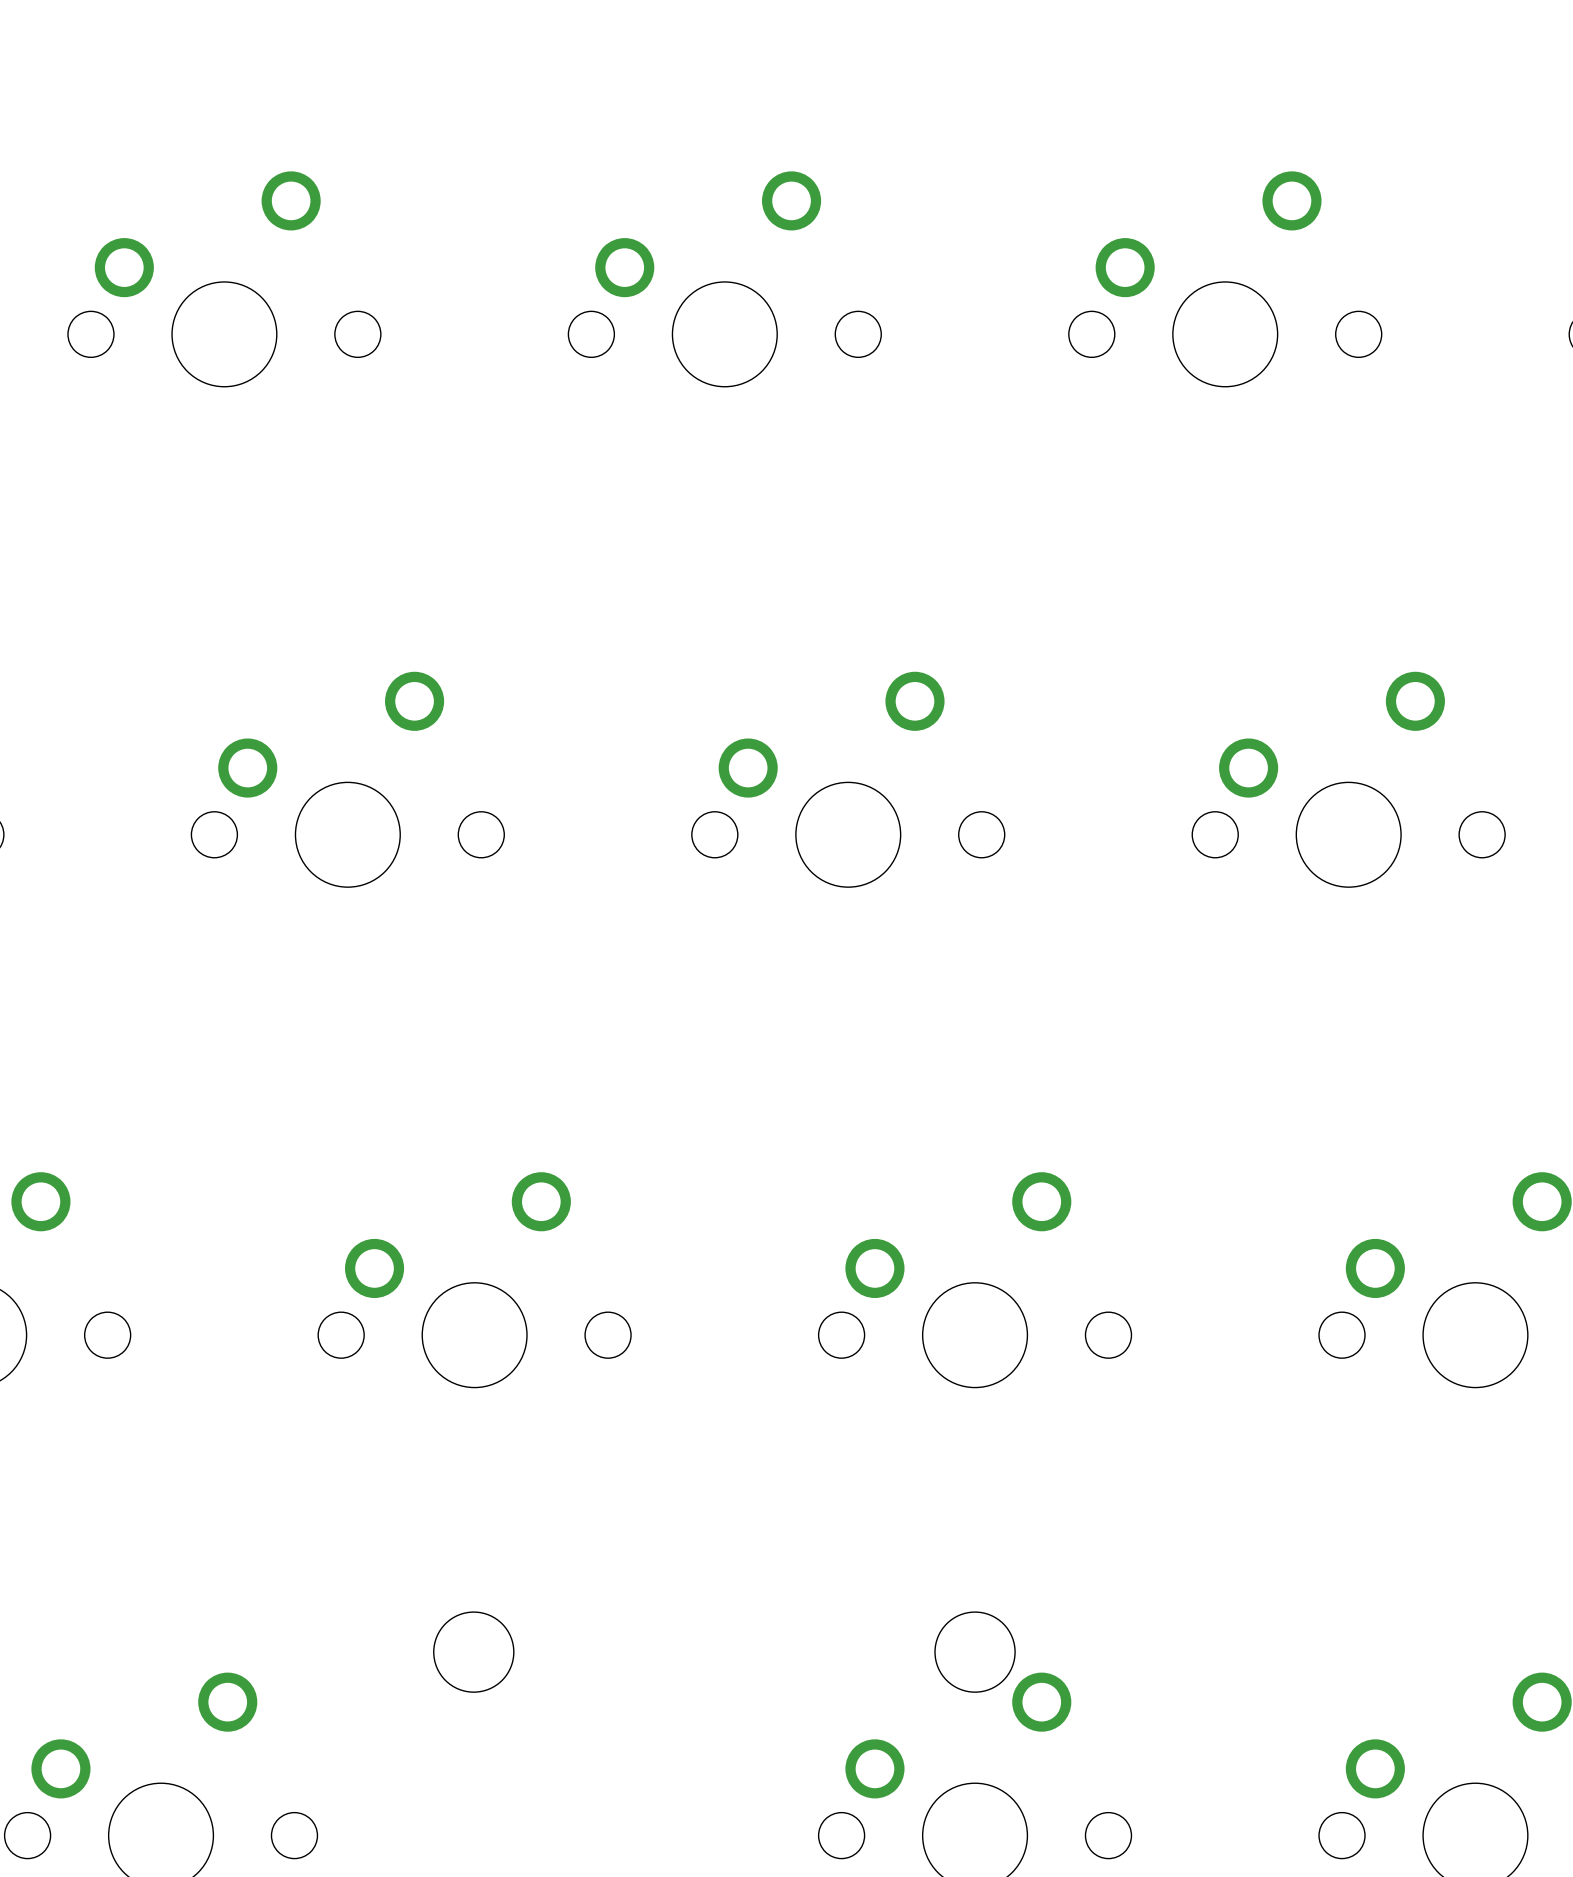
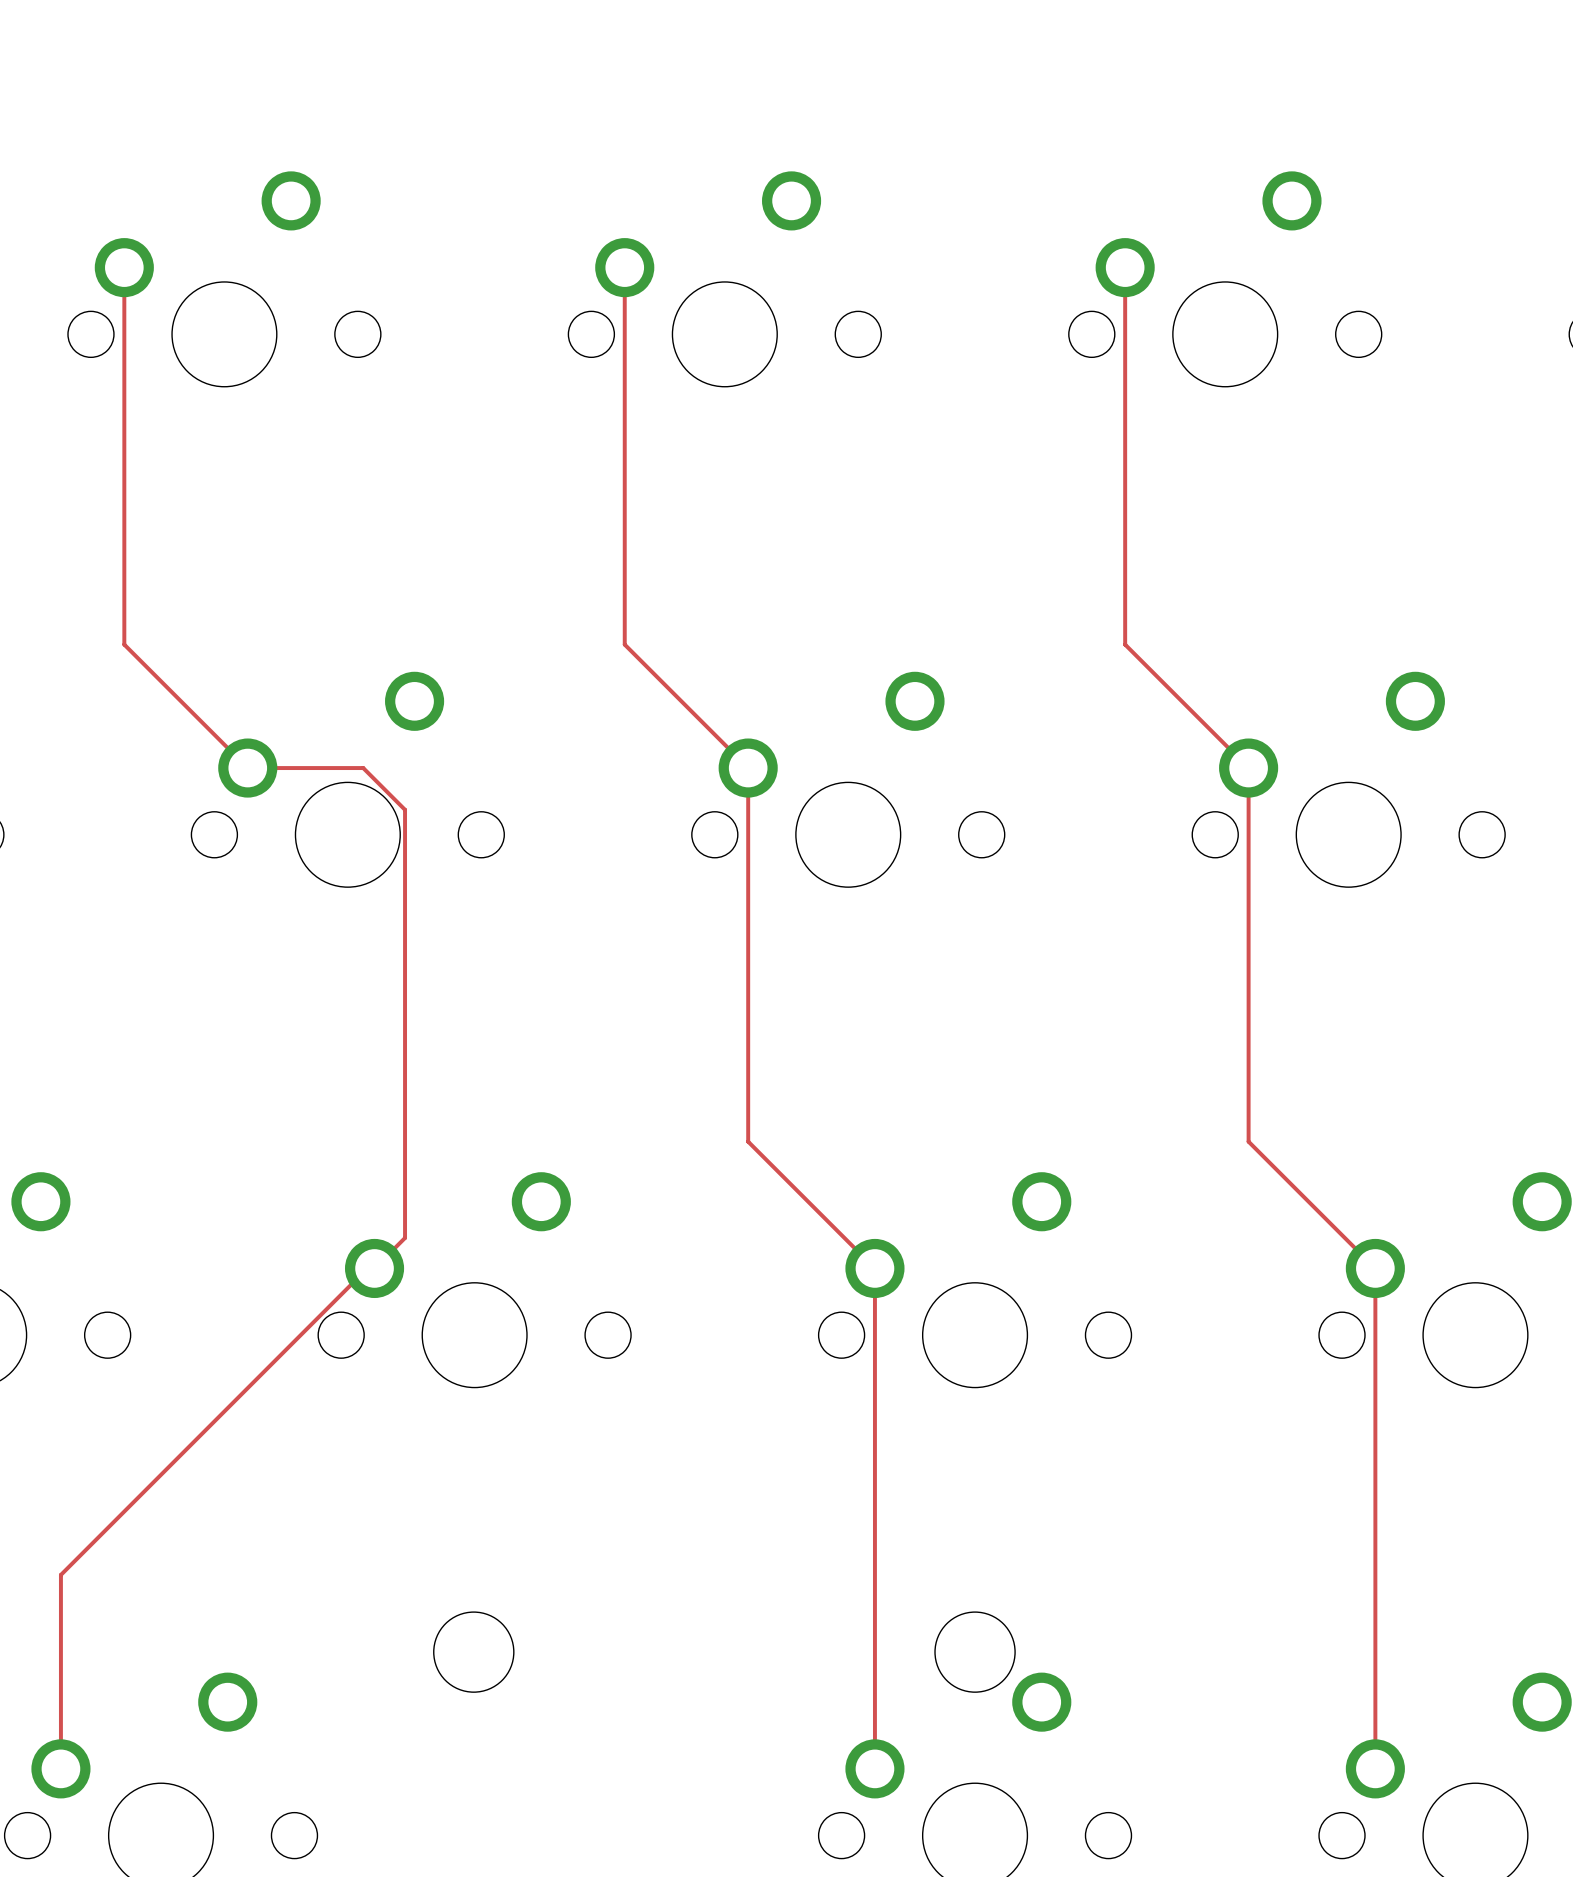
track: none -> (124, 267) (124, 644) (247, 768) (363, 768) (405, 809) (405, 1237) (374, 1268) (367, 1268) (60, 1574) (60, 1768)
track: none -> (624, 267) (624, 644) (748, 768) (748, 1141) (874, 1268) (874, 1768)
track: none -> (1125, 267) (1125, 644) (1248, 768) (1248, 1141) (1375, 1268) (1375, 1768)

